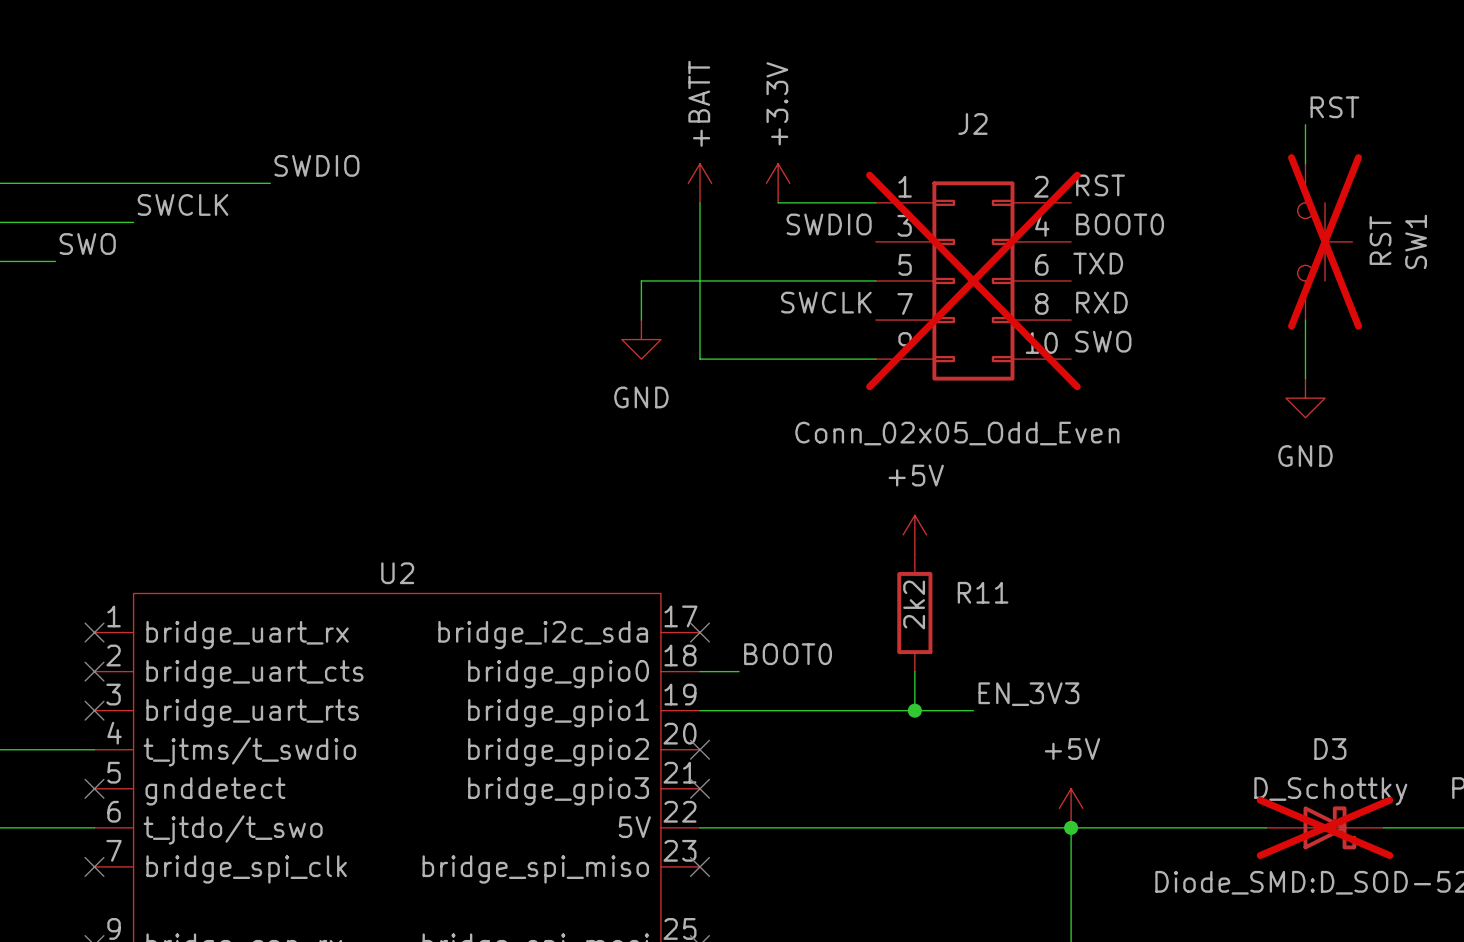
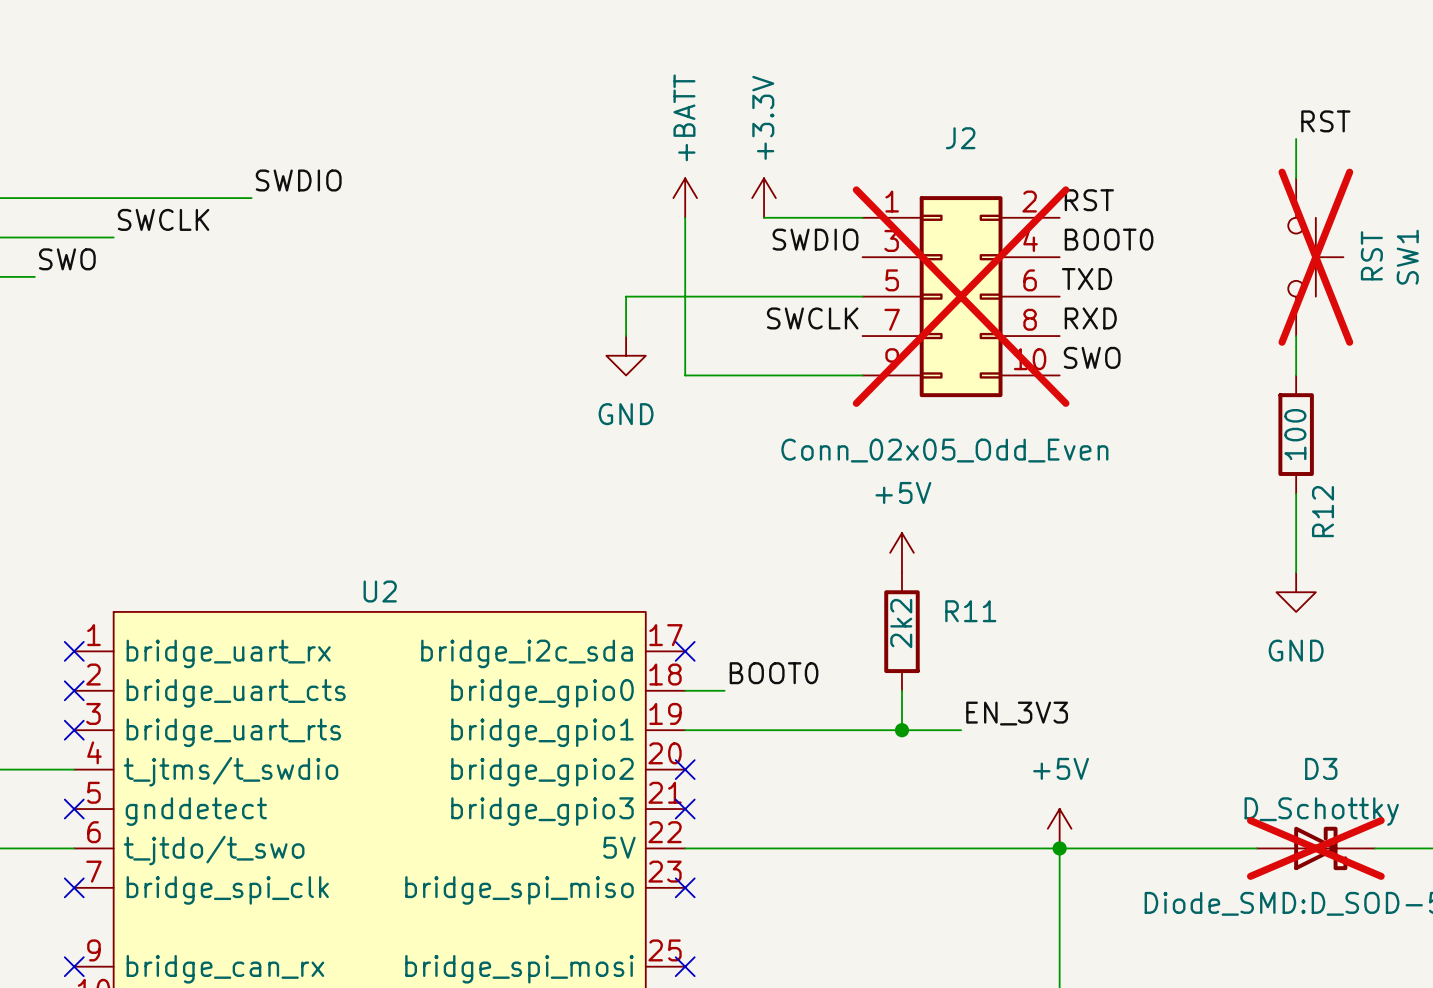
power symbol position: GND (1305, 398) -> GND (1296, 592)
R12: none -> 100 (1296, 434)
wire: none -> (1296, 493) (1296, 572)

